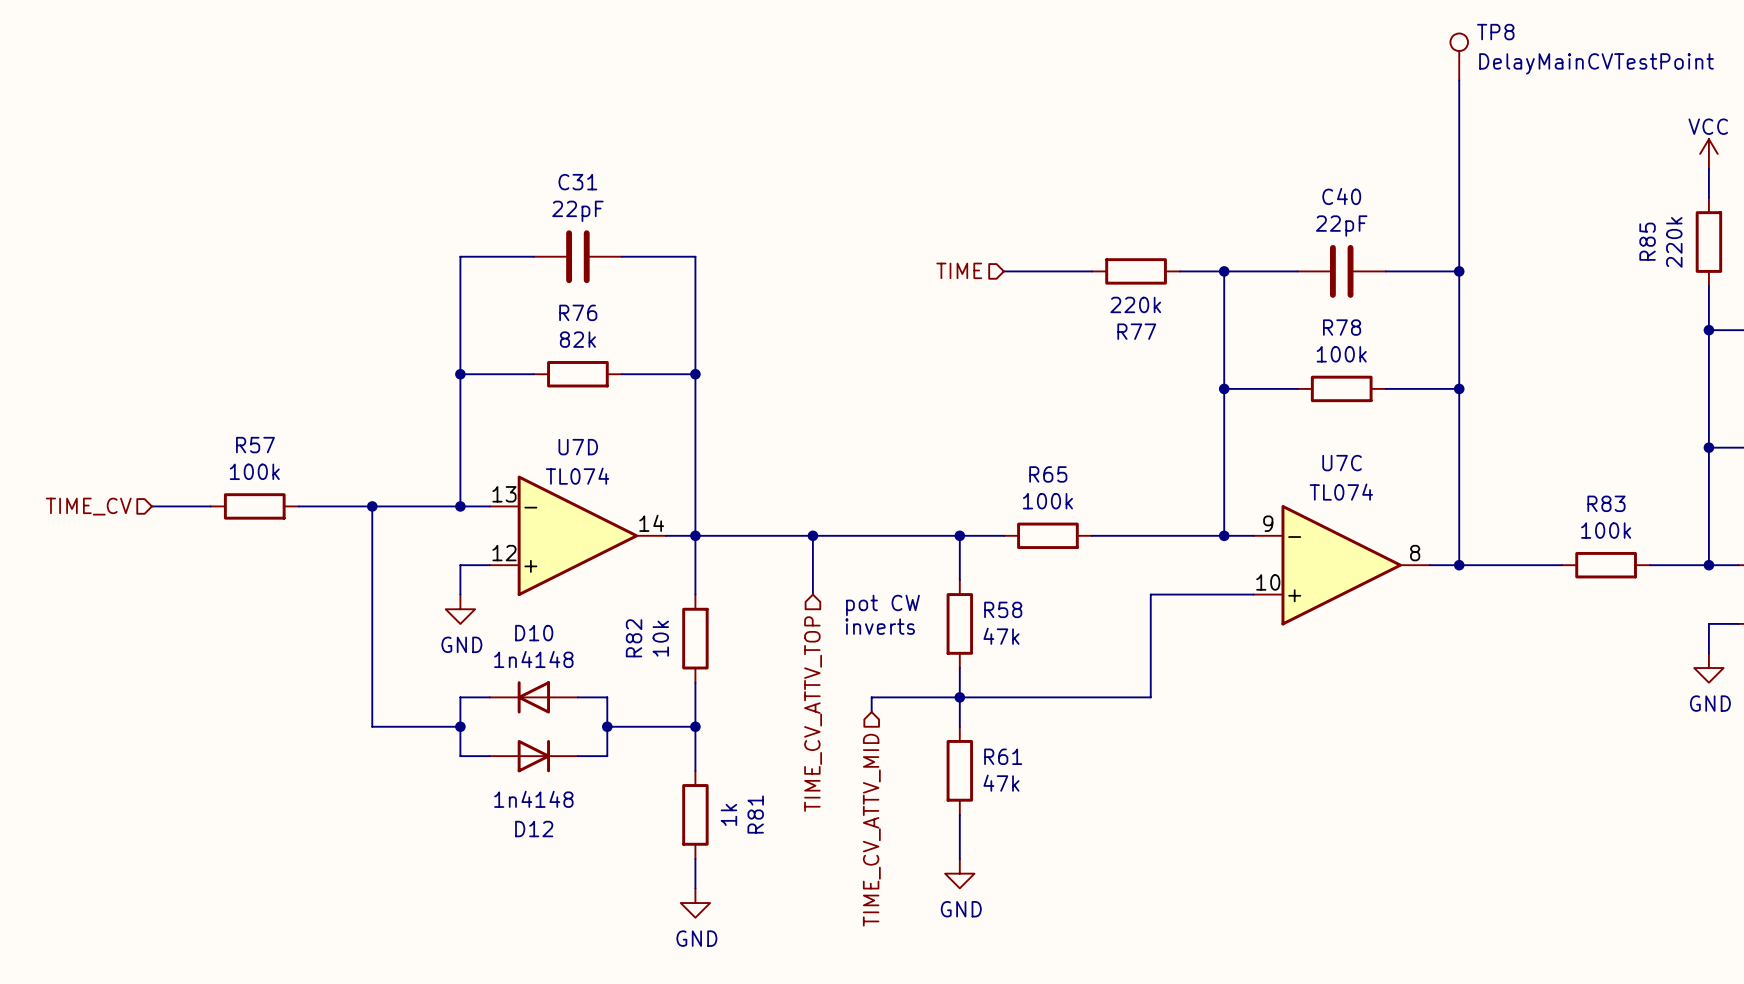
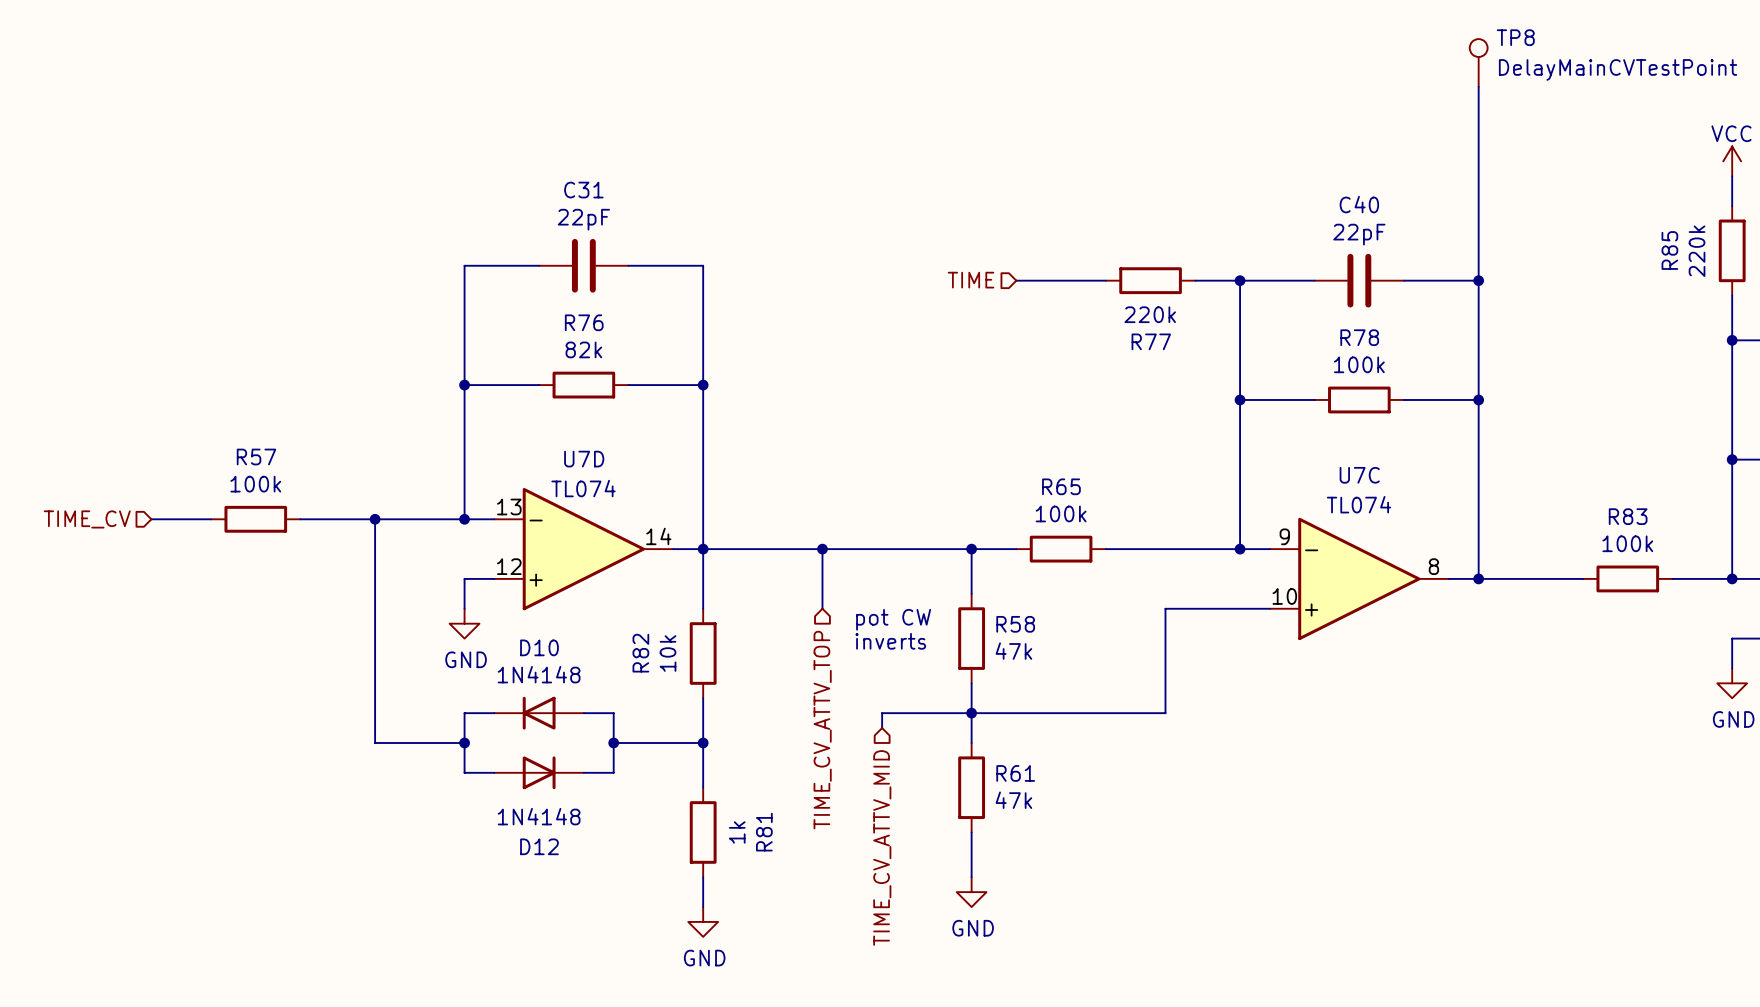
D10 value: 1n4148 (533, 659) -> 1N4148 (539, 674)
D12 value: 1n4148 (533, 799) -> 1N4148 (539, 816)

